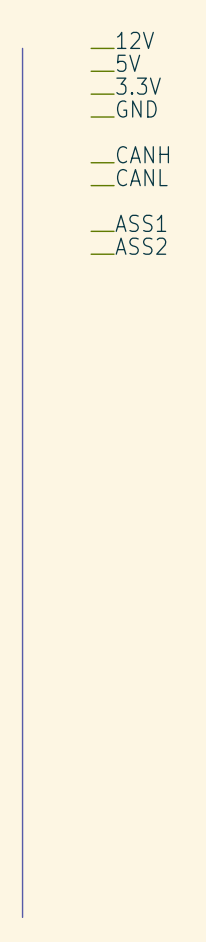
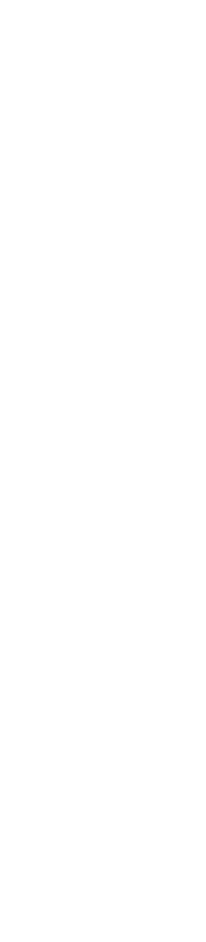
label: 12V (135, 40) -> none
bus: (22, 48) (22, 917) -> none
wire: (91, 48) (114, 48) -> none
label: 5V (128, 63) -> none
wire: (91, 71) (114, 71) -> none
label: 3.3V (138, 86) -> none
wire: (91, 94) (114, 94) -> none
label: GND (136, 109) -> none
wire: (91, 117) (114, 117) -> none
label: CANH (142, 154) -> none
wire: (91, 162) (114, 162) -> none
label: CANL (142, 177) -> none
wire: (91, 185) (114, 185) -> none
label: ASS1 (140, 223) -> none
wire: (91, 231) (114, 231) -> none
label: ASS2 (140, 246) -> none
wire: (91, 254) (114, 254) -> none

